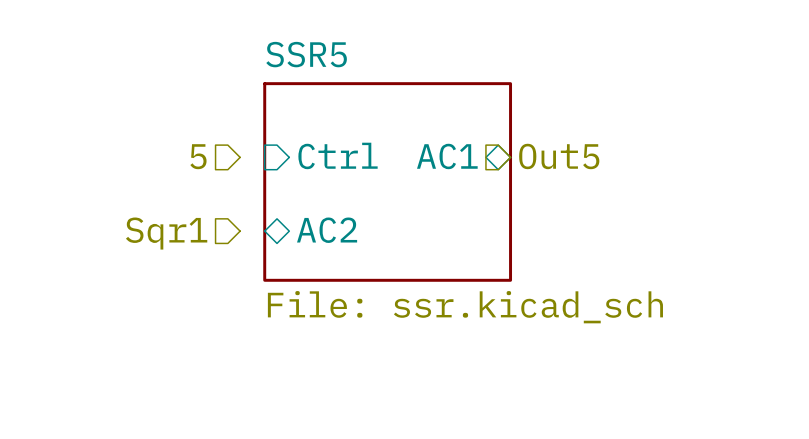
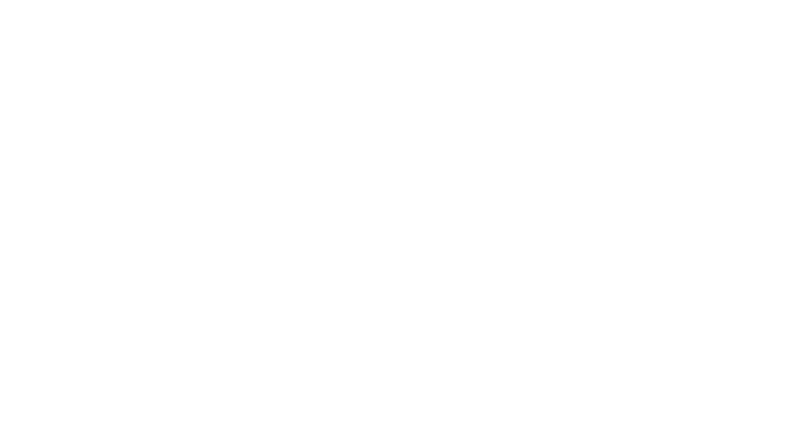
sheet pin: Ctrl (338, 155) -> none
hierarchical label: 5 (198, 156) -> none
sheet pin: AC1 (447, 156) -> none
hierarchical label: Out5 (559, 156) -> none
sheet SSR5: File: ssr.kicad_sch (387, 181) -> none
sheet pin: AC2 (327, 230) -> none
hierarchical label: Sqr1 (166, 233) -> none

